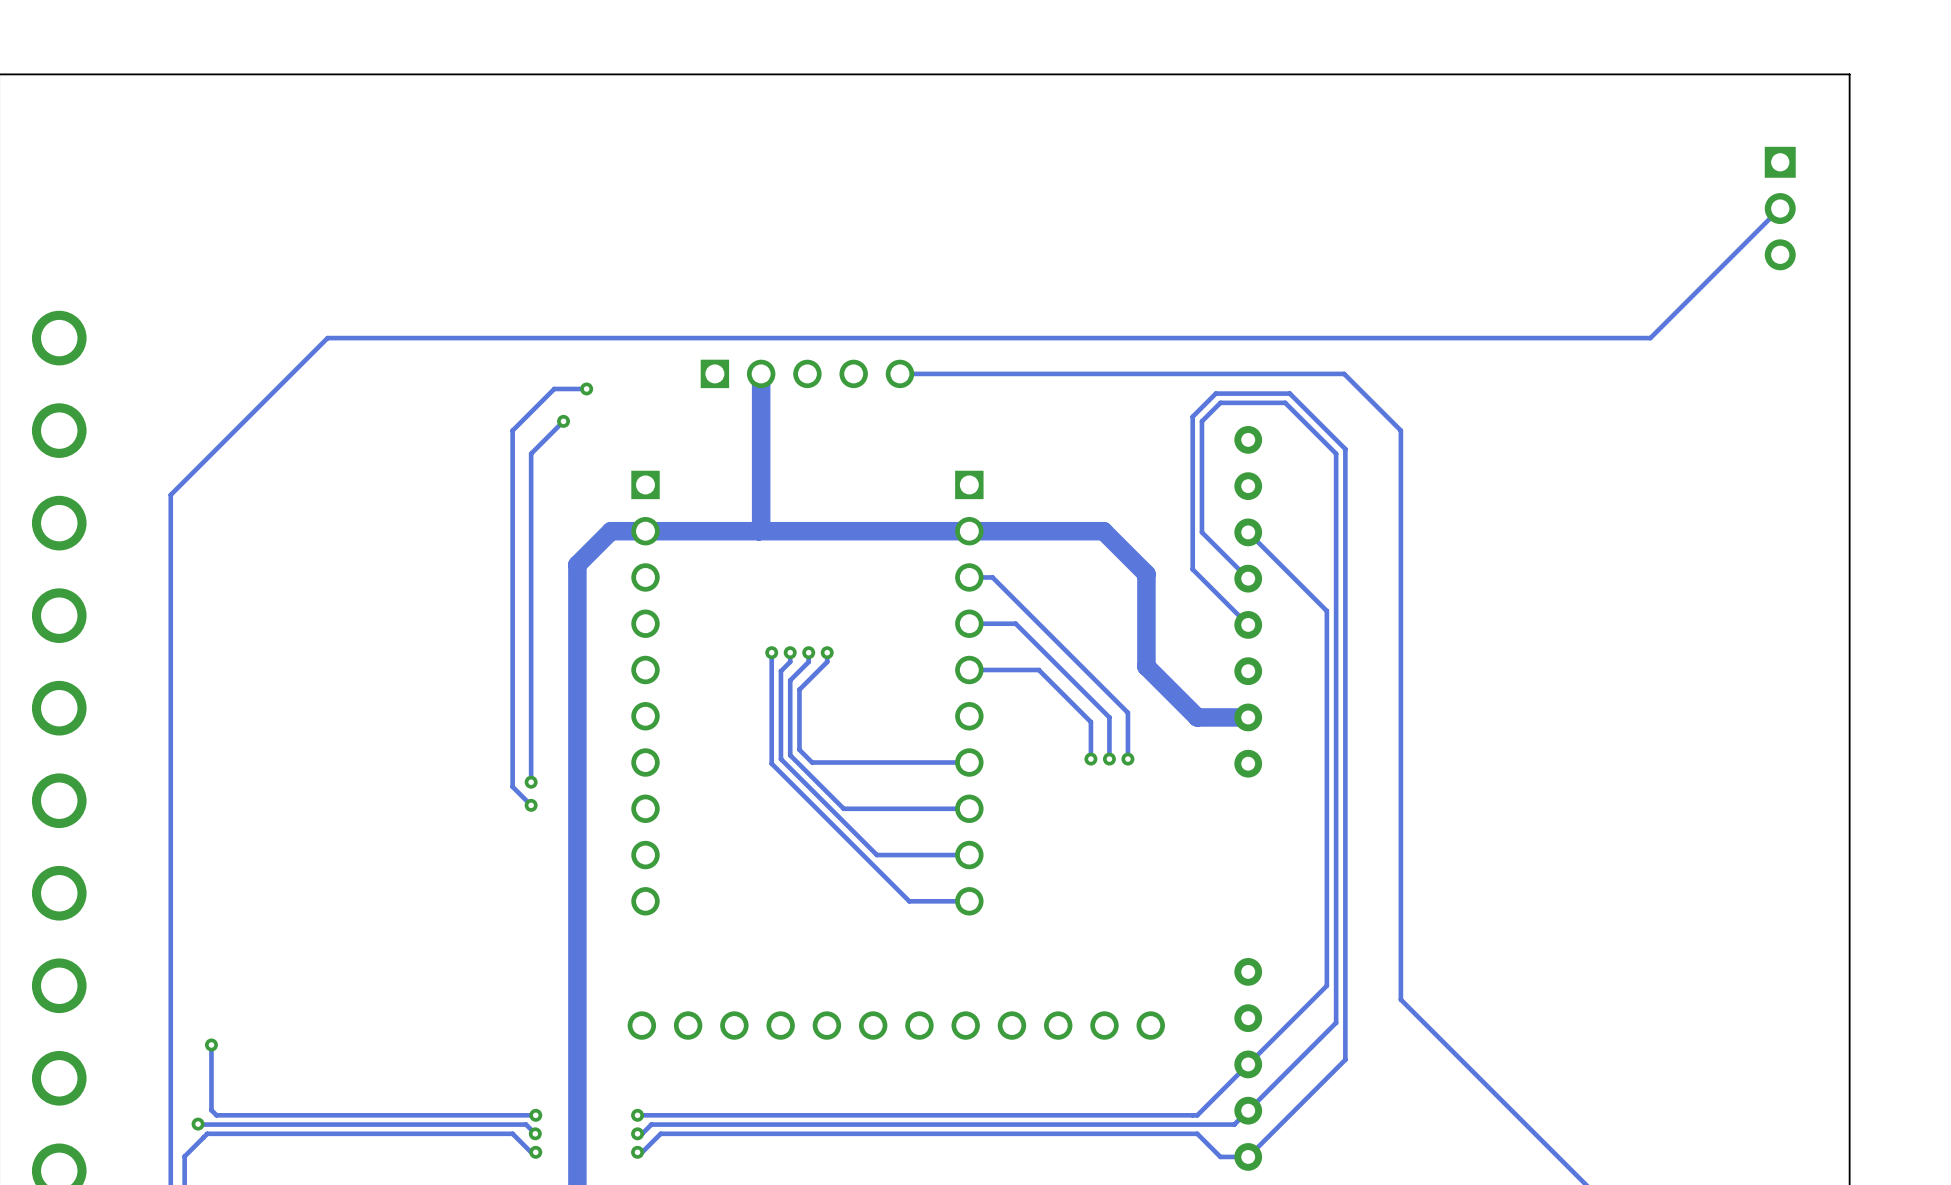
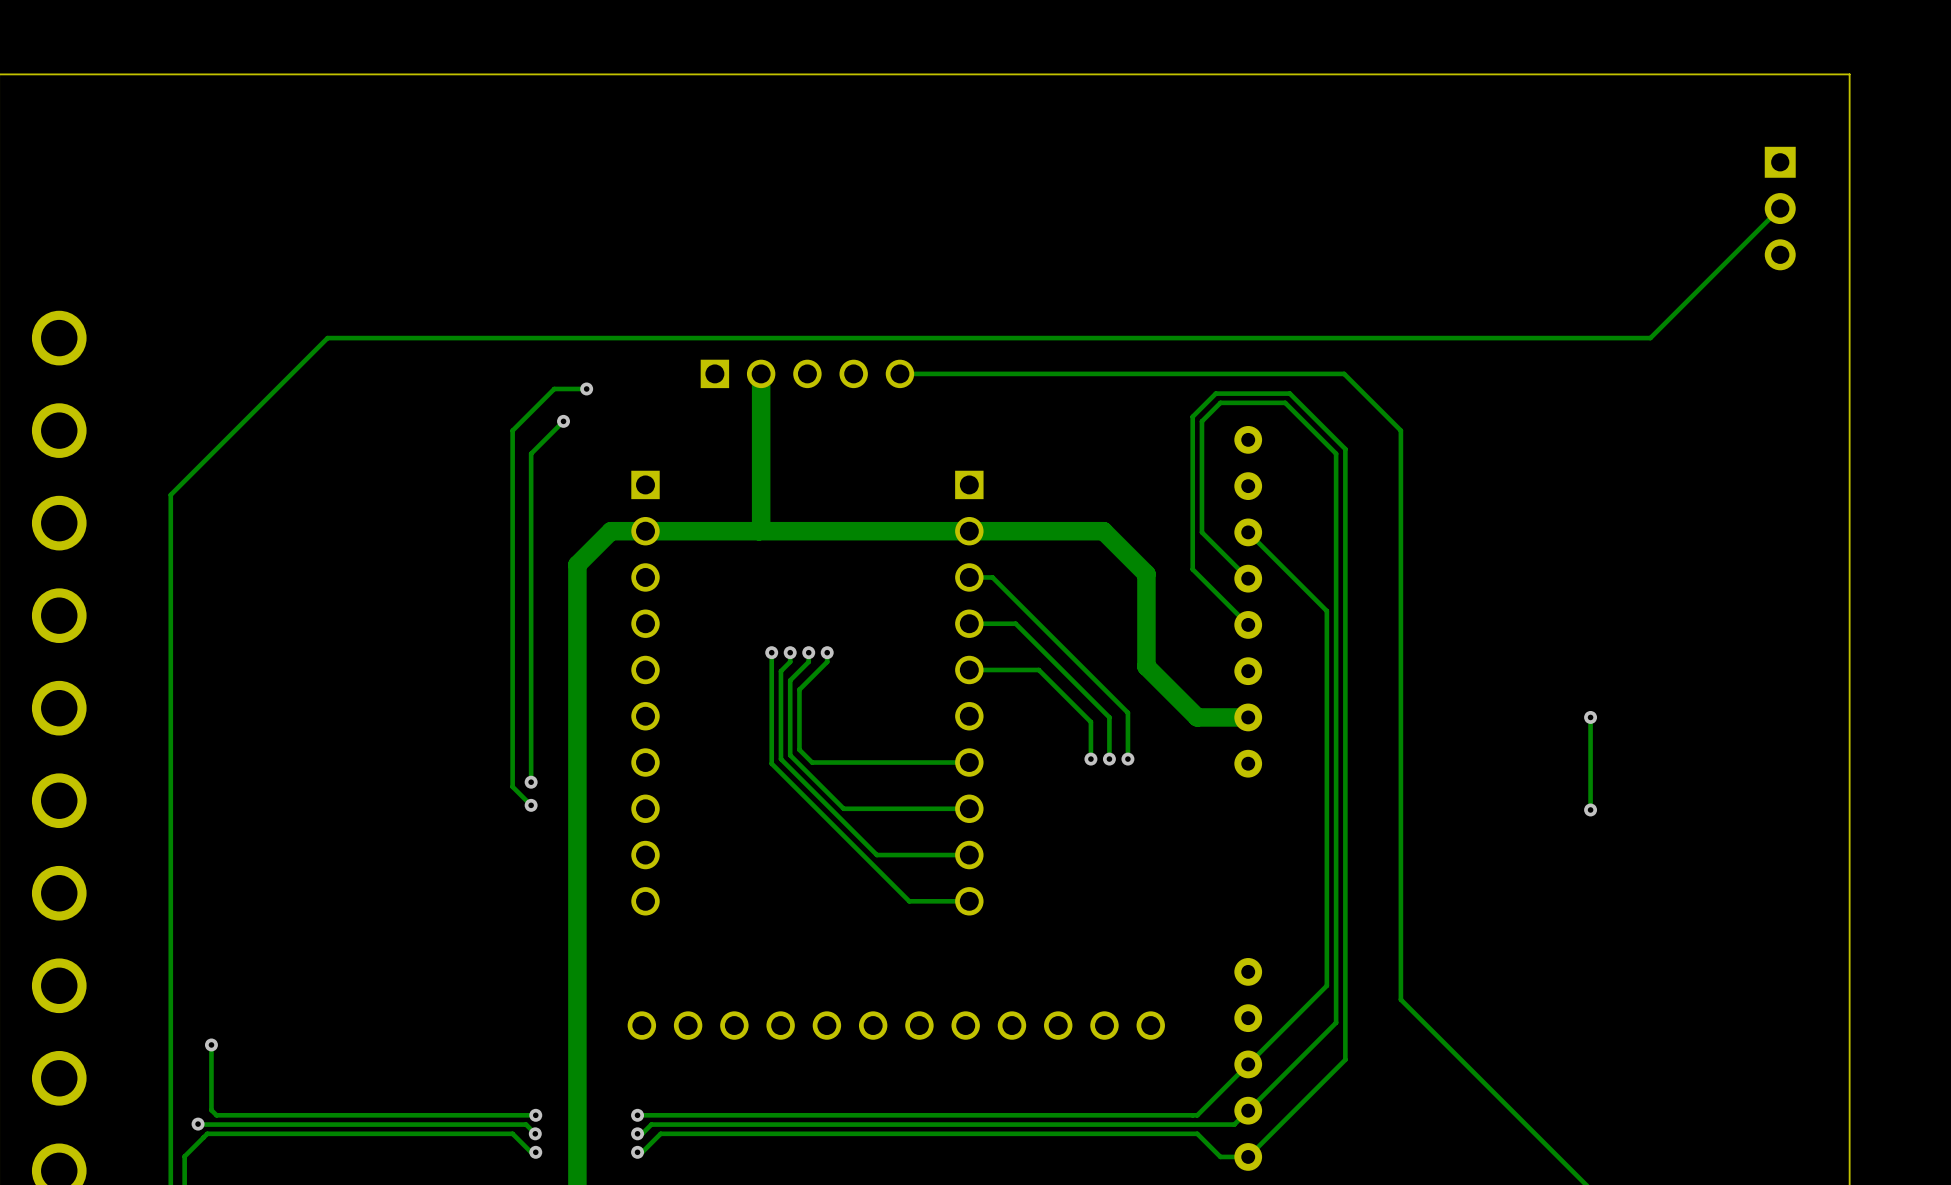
track: none -> (1590, 717) (1590, 809)
via: none -> (1590, 717)
via: none -> (1590, 809)

